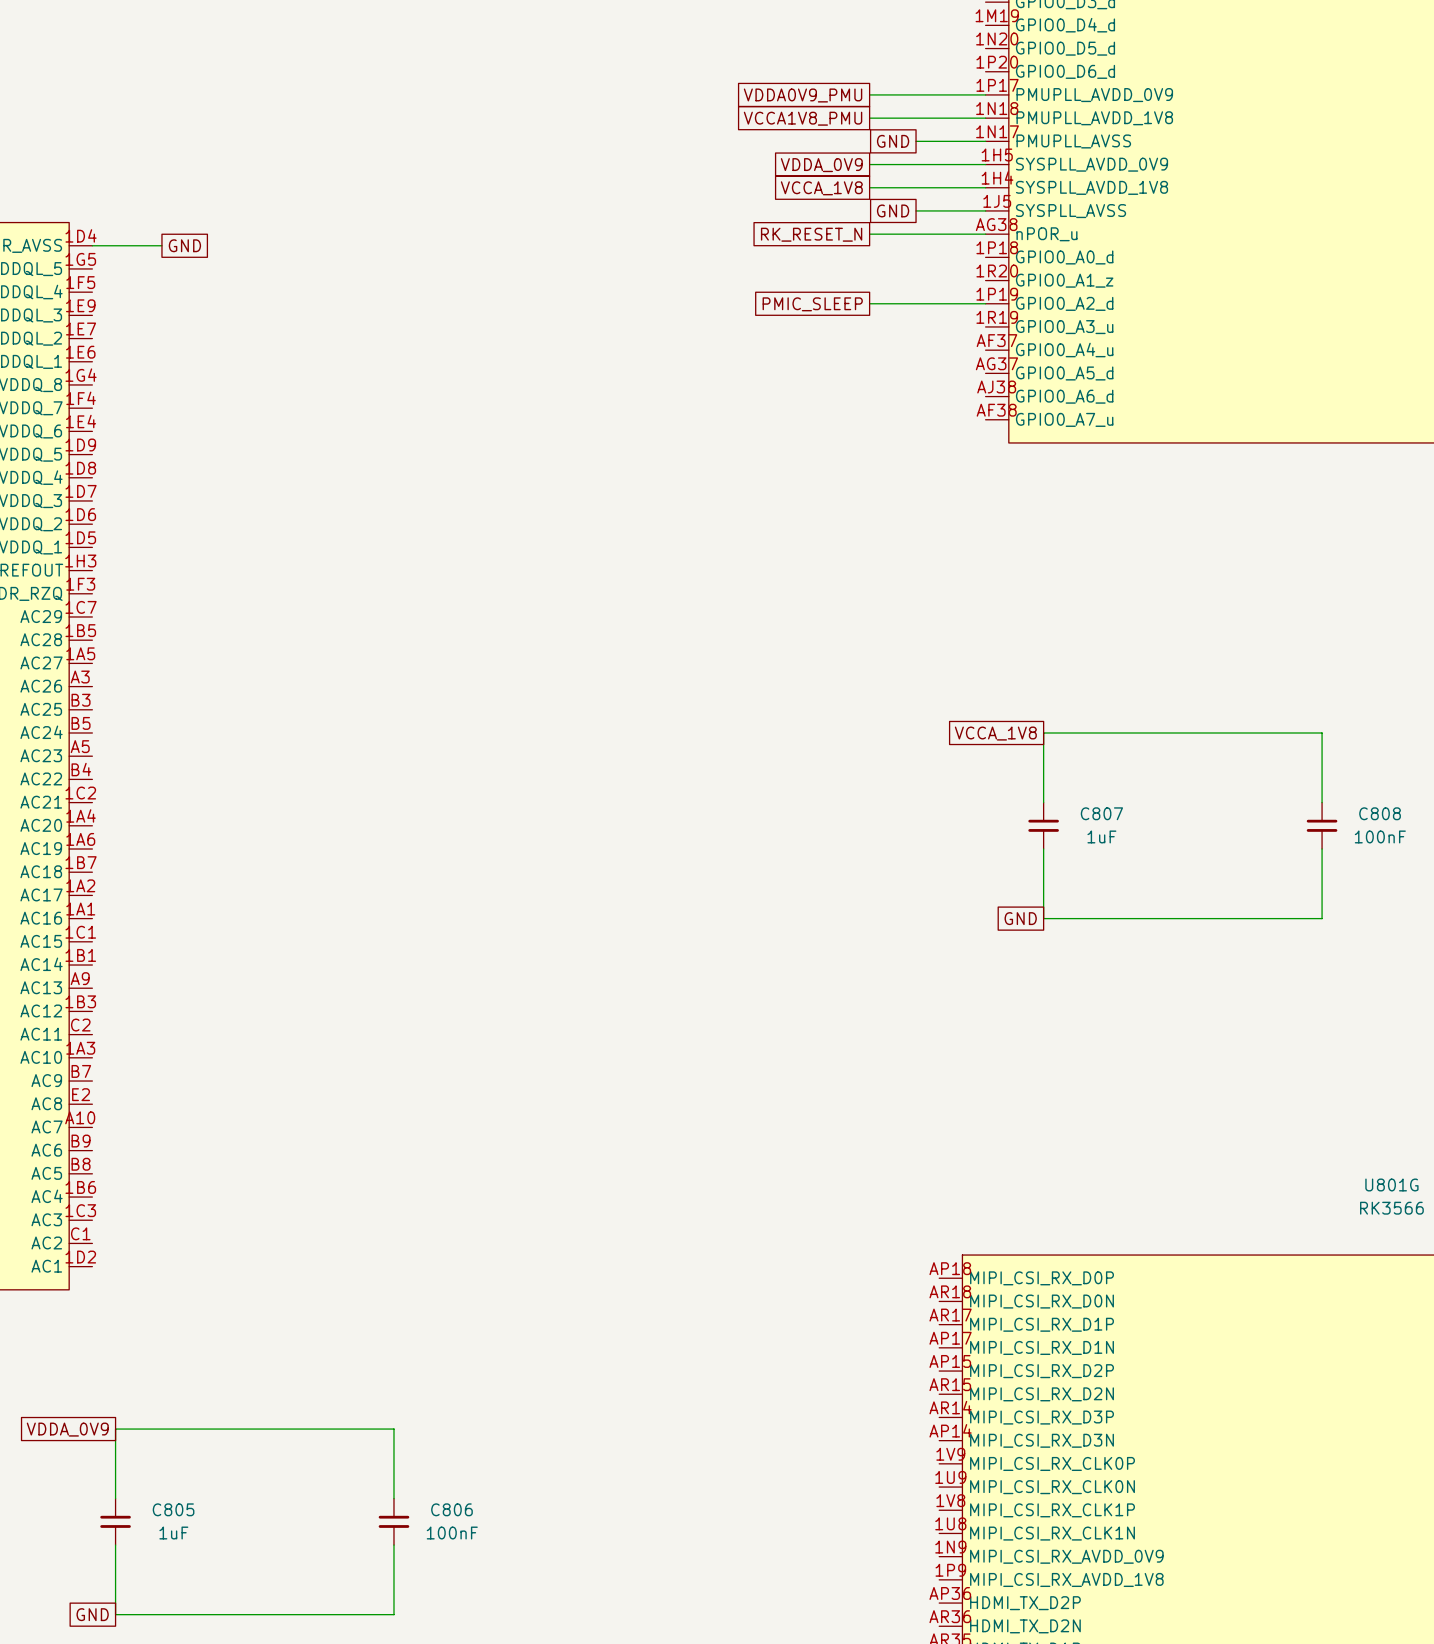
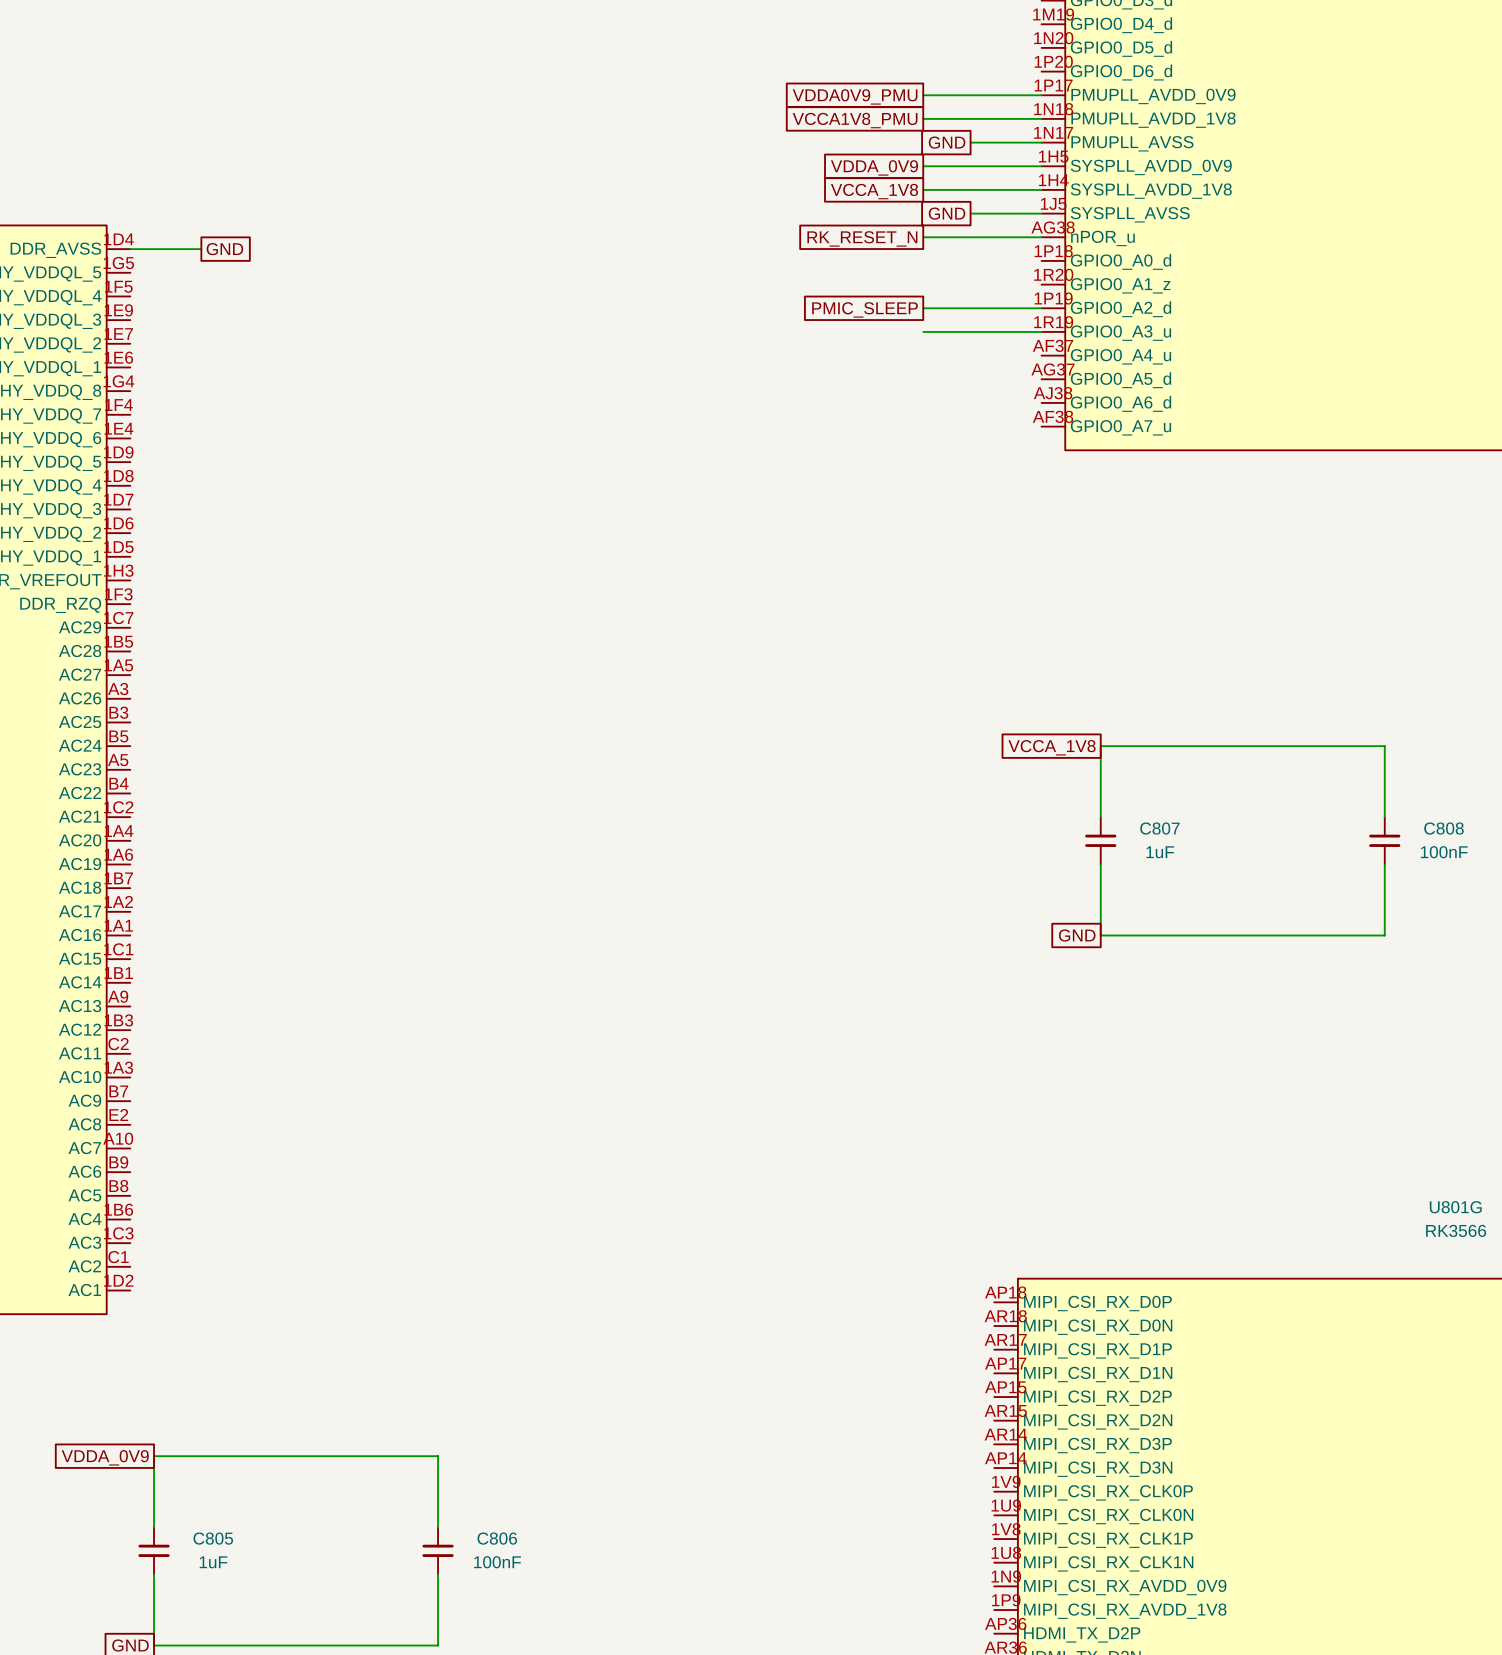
wire: none -> (923, 331) (1041, 331)

